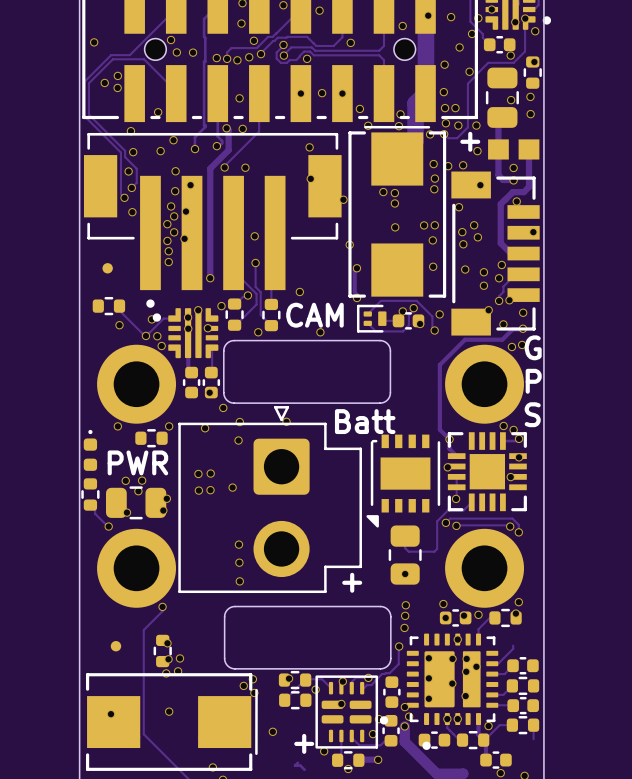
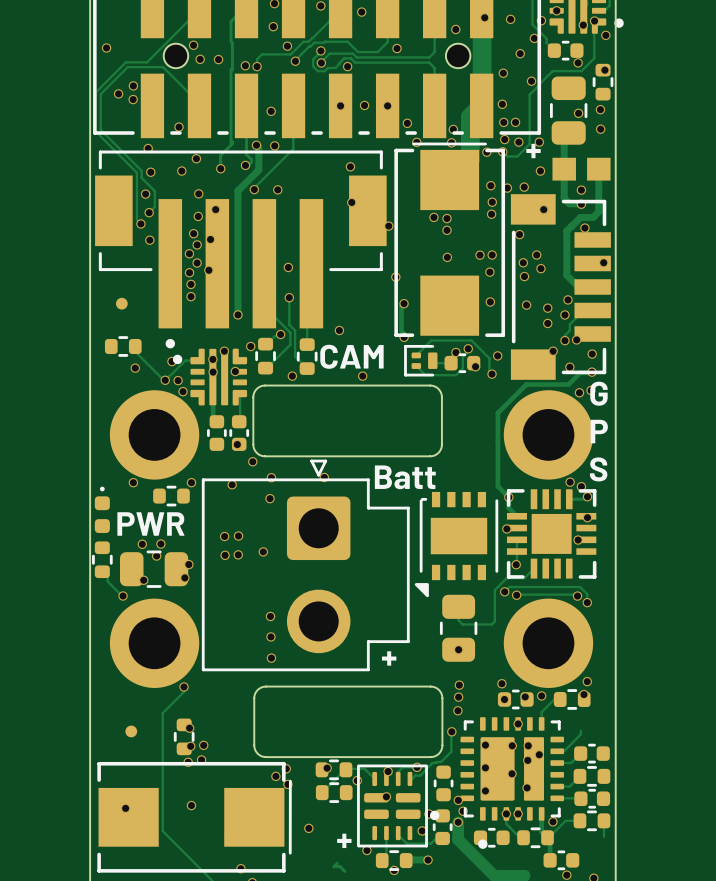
via: (249, 57) -> none
via: (237, 60) -> none

